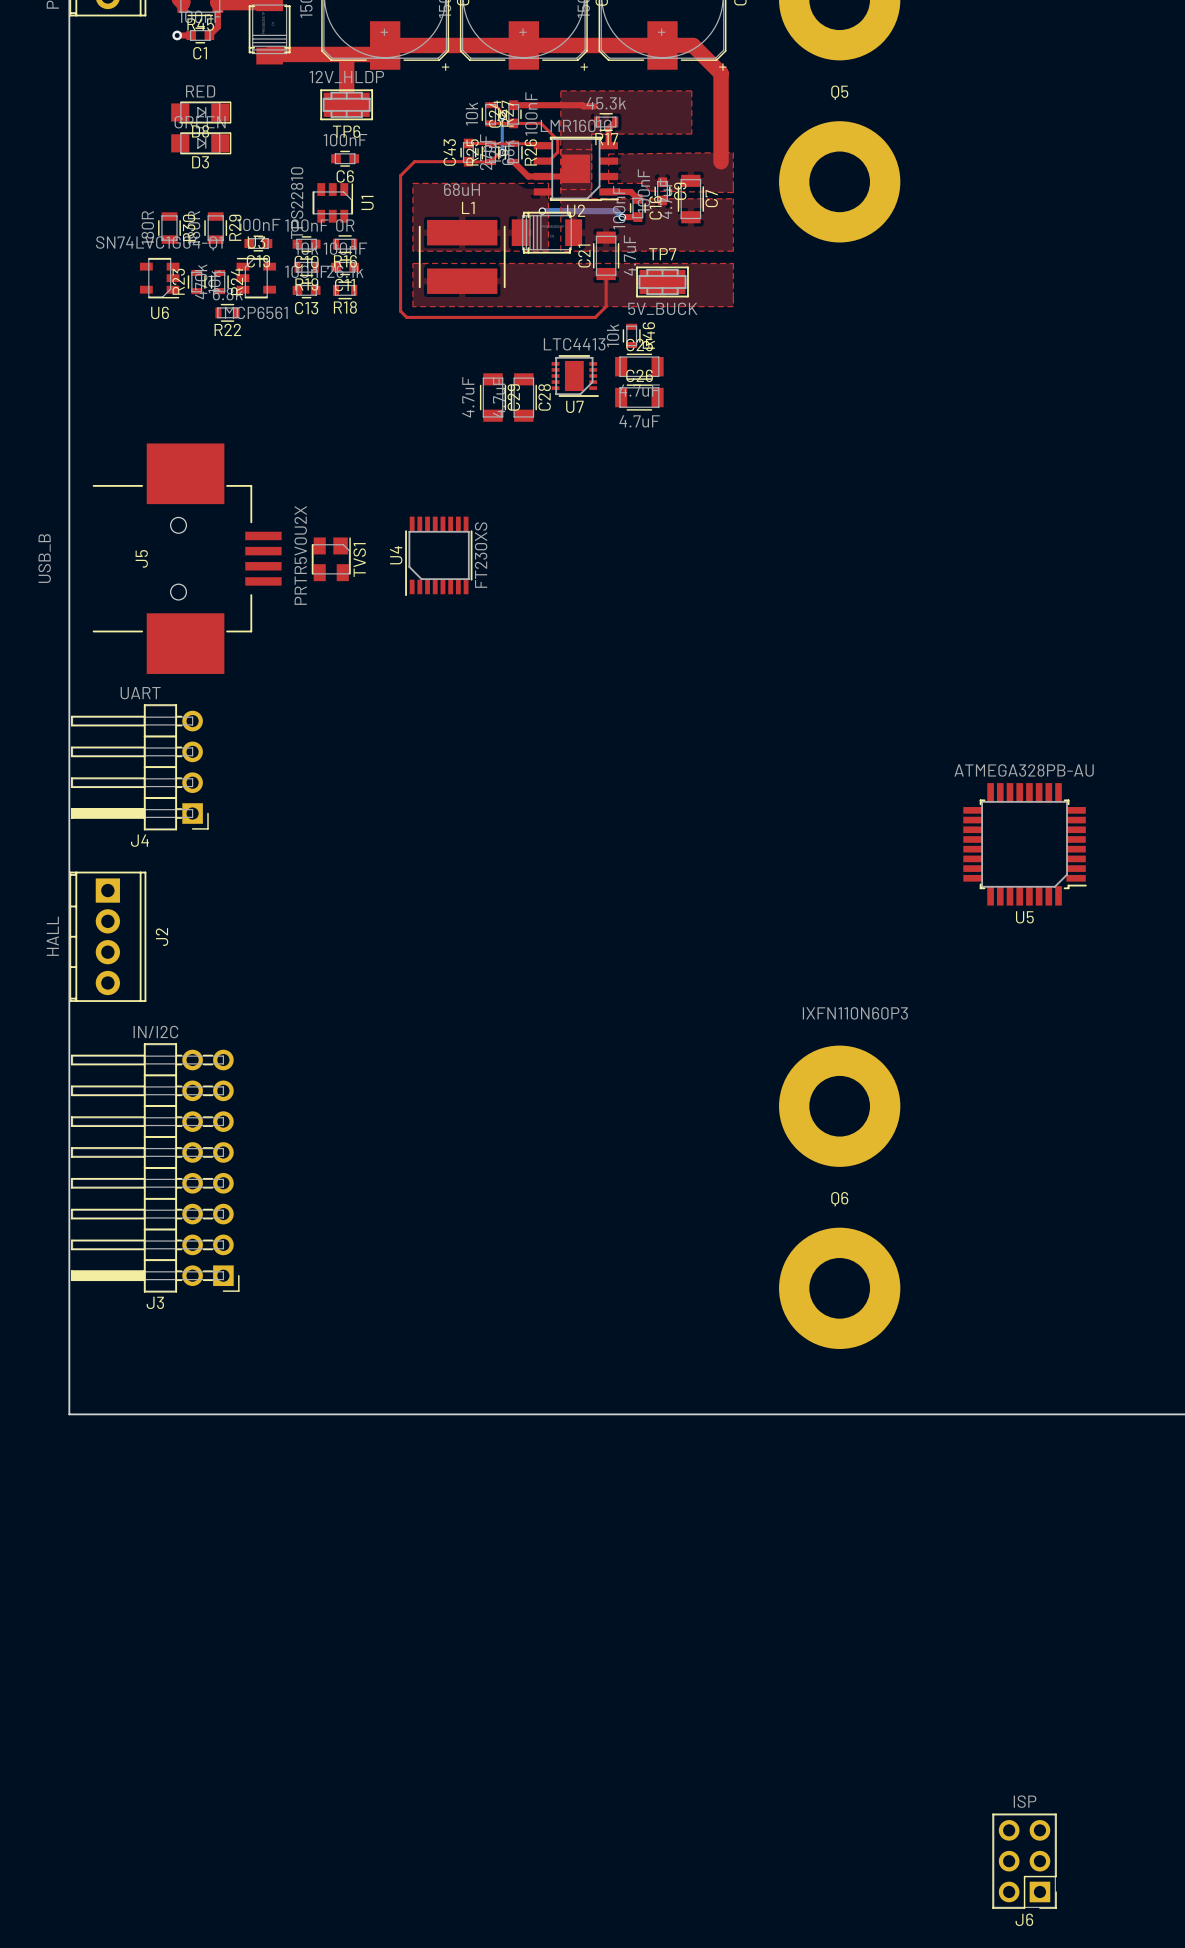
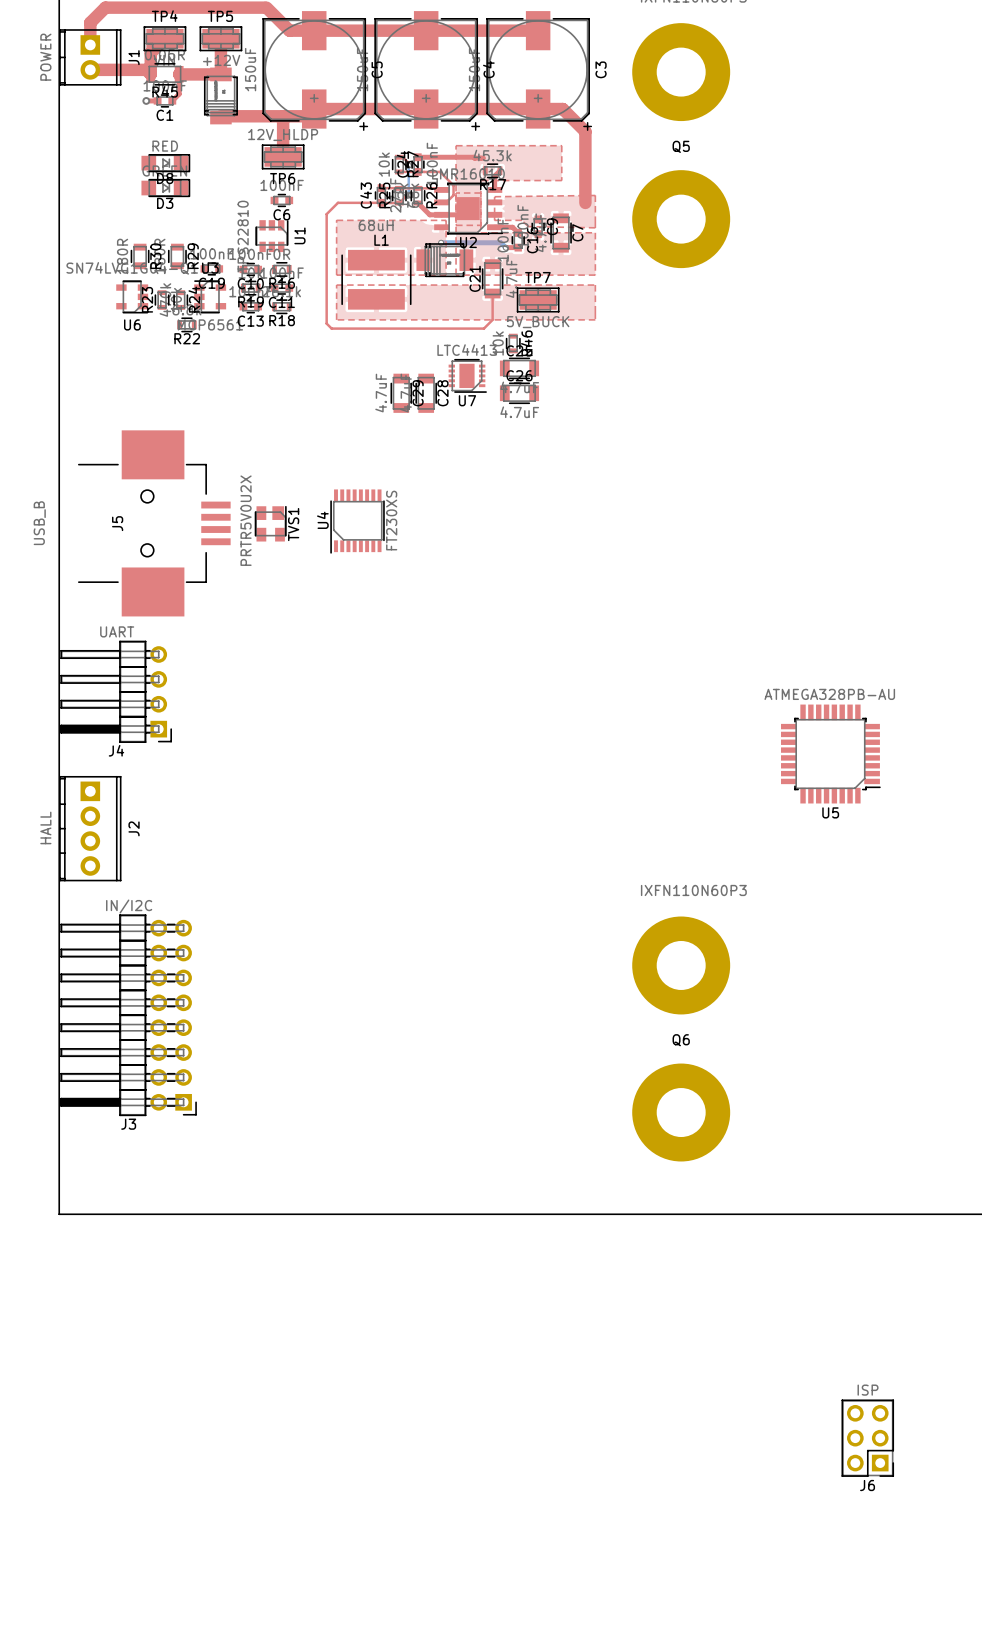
J6 position: (1024, 1861) -> (867, 1438)

